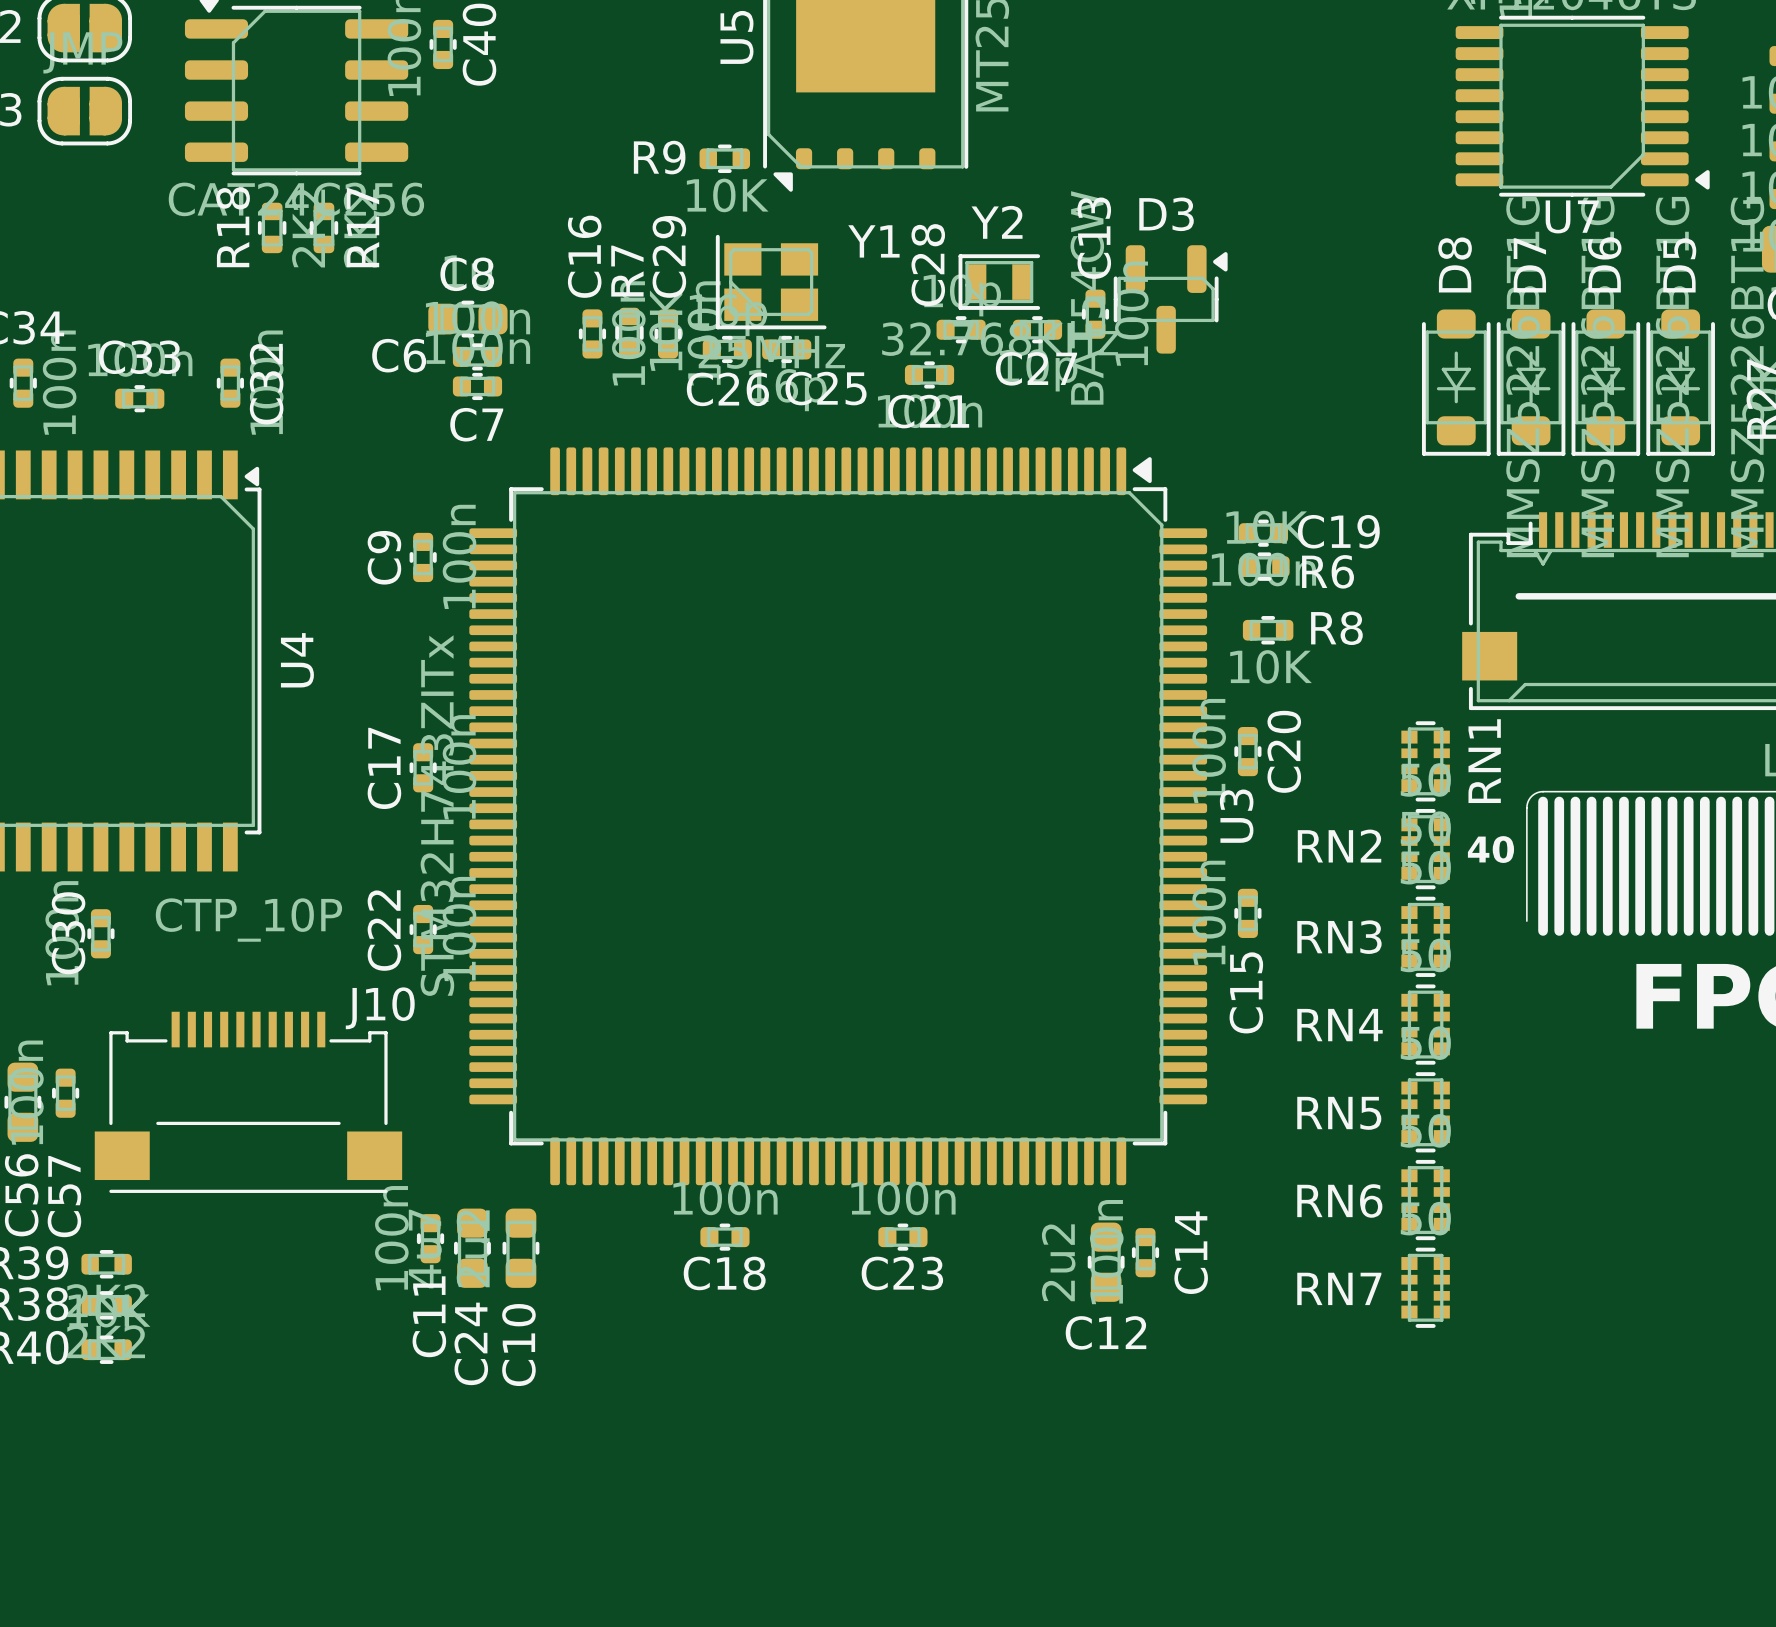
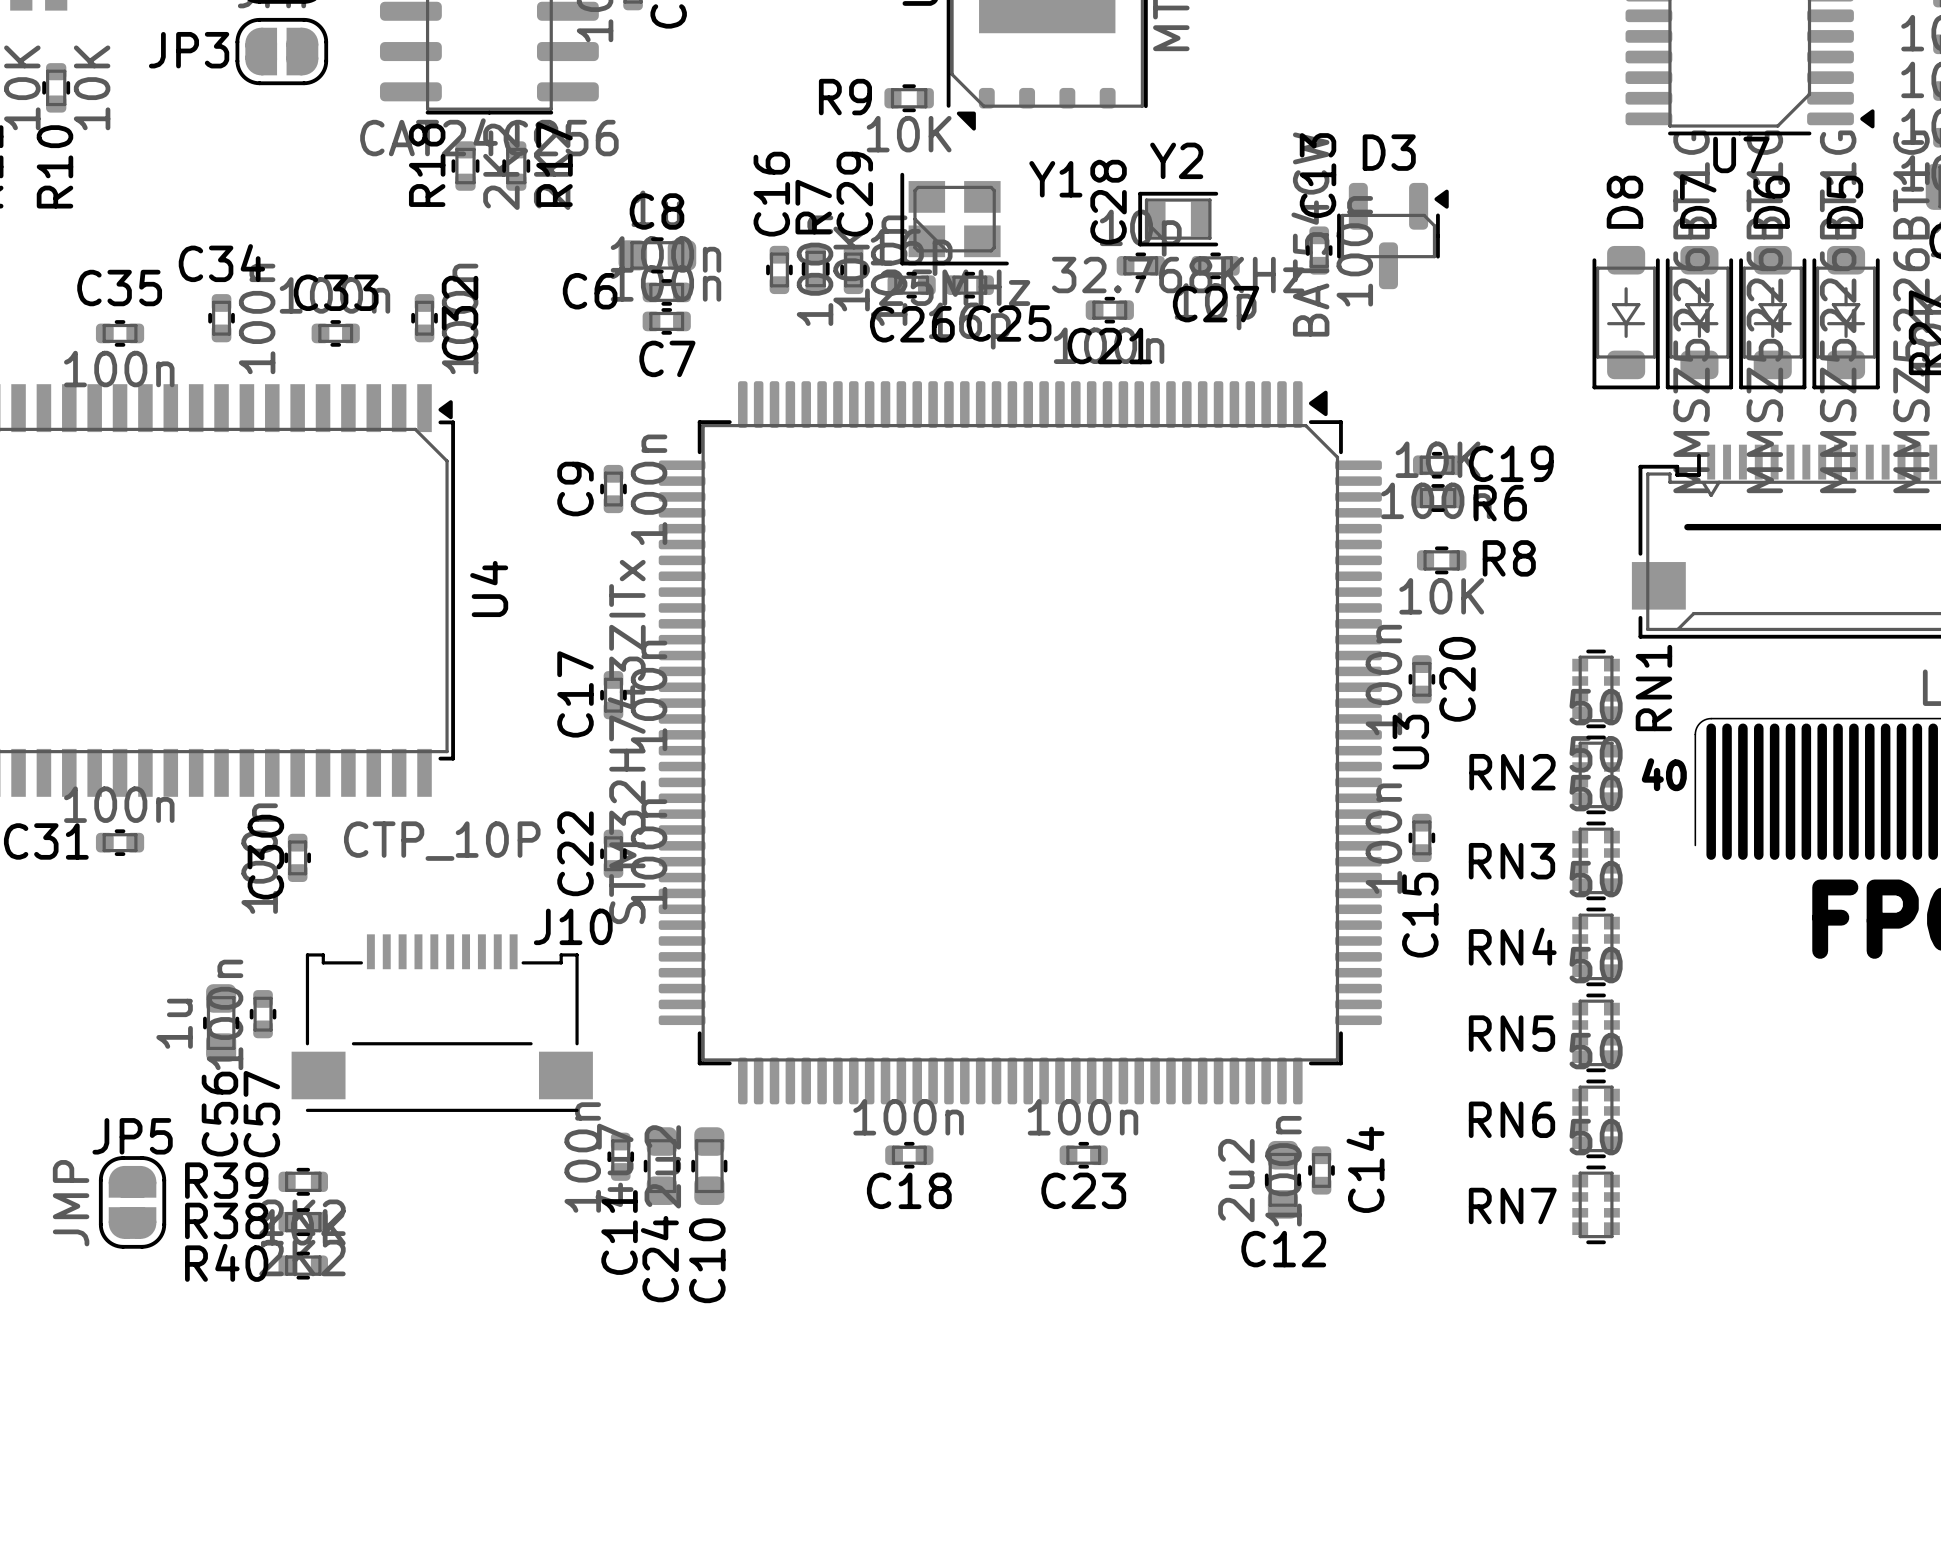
D3 position: (1170, 299) -> (1392, 236)
C13 position: (1095, 314) -> (1319, 250)

